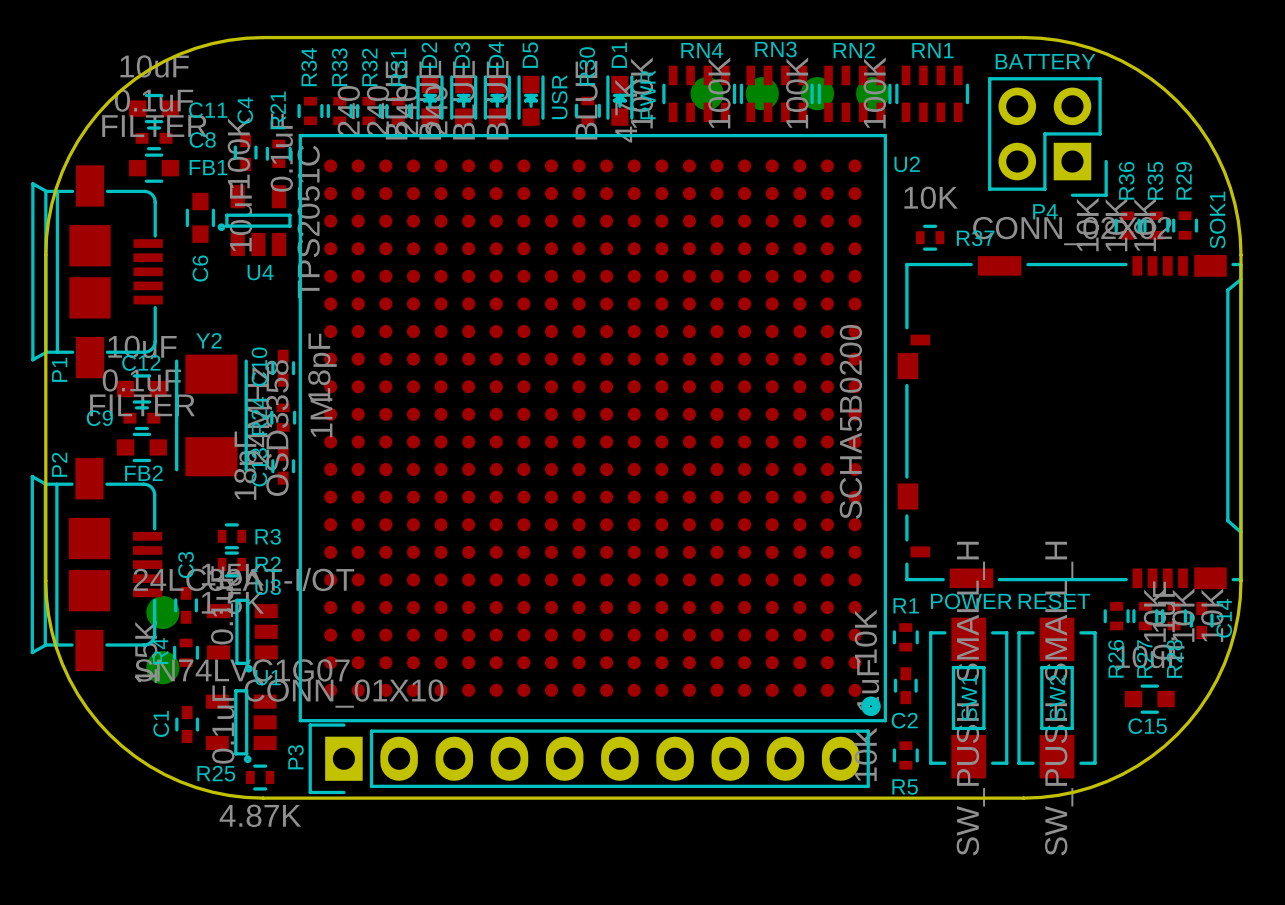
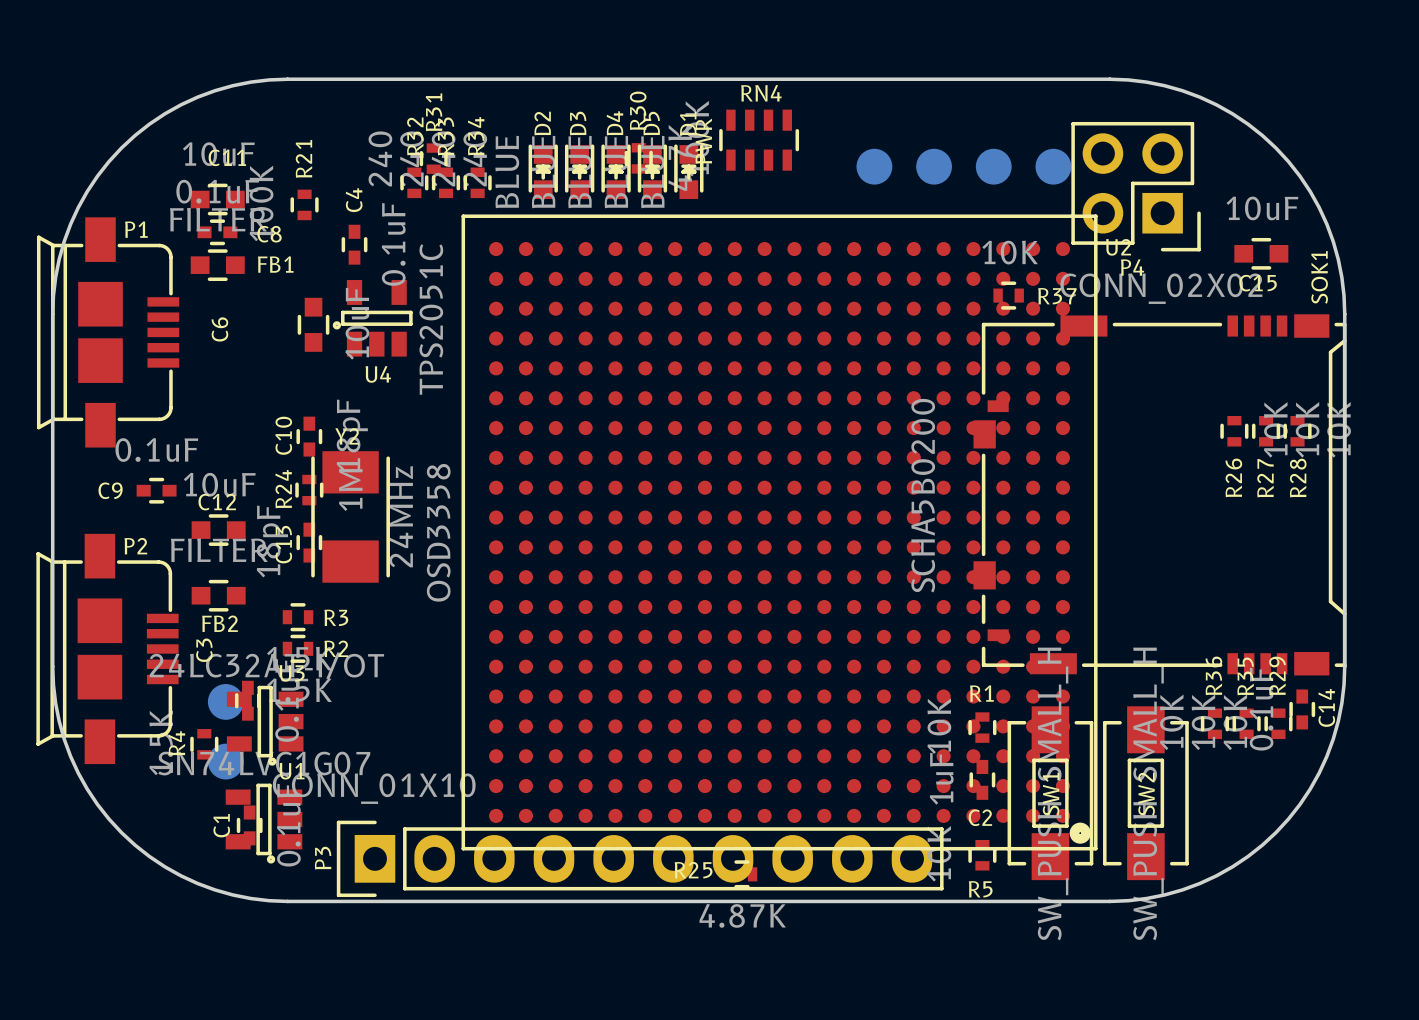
text: BATTERY (1045, 61) -> none
part: (707, 93) -> none
part: (762, 93) -> none
RN3: 100K (776, 93) -> none
part: (817, 93) -> none
RN2: 100K (854, 93) -> none
part: (872, 93) -> none
RN1: 100K (932, 93) -> none
text: USR (559, 97) -> none
D2 position: (430, 100) -> (543, 171)
D3 position: (463, 100) -> (579, 171)
D4 position: (497, 100) -> (616, 171)
D5 position: (531, 100) -> (652, 171)
D1 position: (619, 100) -> (688, 171)
C11 position: (154, 108) -> (217, 199)
R34 position: (310, 111) -> (477, 182)
R33 position: (339, 111) -> (445, 182)
R32 position: (368, 111) -> (414, 182)
part: none -> (874, 166)
part: none -> (934, 166)
part: none -> (993, 166)
part: none -> (1053, 166)
C8 position: (154, 138) -> (217, 232)
C4 position: (245, 152) -> (354, 244)
FB1 position: (154, 168) -> (217, 265)
C6 position: (200, 217) -> (313, 324)
U4 position: (254, 220) -> (372, 318)
R36 position: (1127, 225) -> (1214, 723)
R35 position: (1156, 225) -> (1246, 723)
R29 position: (1185, 225) -> (1278, 723)
P1 name rotation: 0° (59, 369) -> 90° clockwise (136, 229)
P1 name position: P1 (59, 369) -> P1 (136, 229)
C12 position: (141, 388) -> (218, 530)
Y2 position: (211, 415) -> (350, 516)
U2 position: (592, 428) -> (779, 532)
FB2 position: (141, 447) -> (218, 595)
P2 name rotation: 0° (59, 464) -> 90° clockwise (135, 546)
P2 name position: P2 (59, 464) -> P2 (135, 546)
R3 position: (231, 536) -> (298, 617)
R2 position: (231, 564) -> (298, 648)
text: POWER (971, 601) -> none
text: RESET (1054, 601) -> none
C3 position: (186, 605) -> (247, 700)
part: (162, 612) -> none
part: none -> (225, 701)
R26 position: (1116, 616) -> (1234, 431)
R27 position: (1145, 616) -> (1266, 431)
R28 position: (1174, 616) -> (1297, 431)
part: (162, 667) -> none
part: none -> (225, 761)
C15 position: (1149, 699) -> (1261, 253)
C1 position: (187, 724) -> (249, 825)
R25 position: (260, 777) -> (742, 874)

